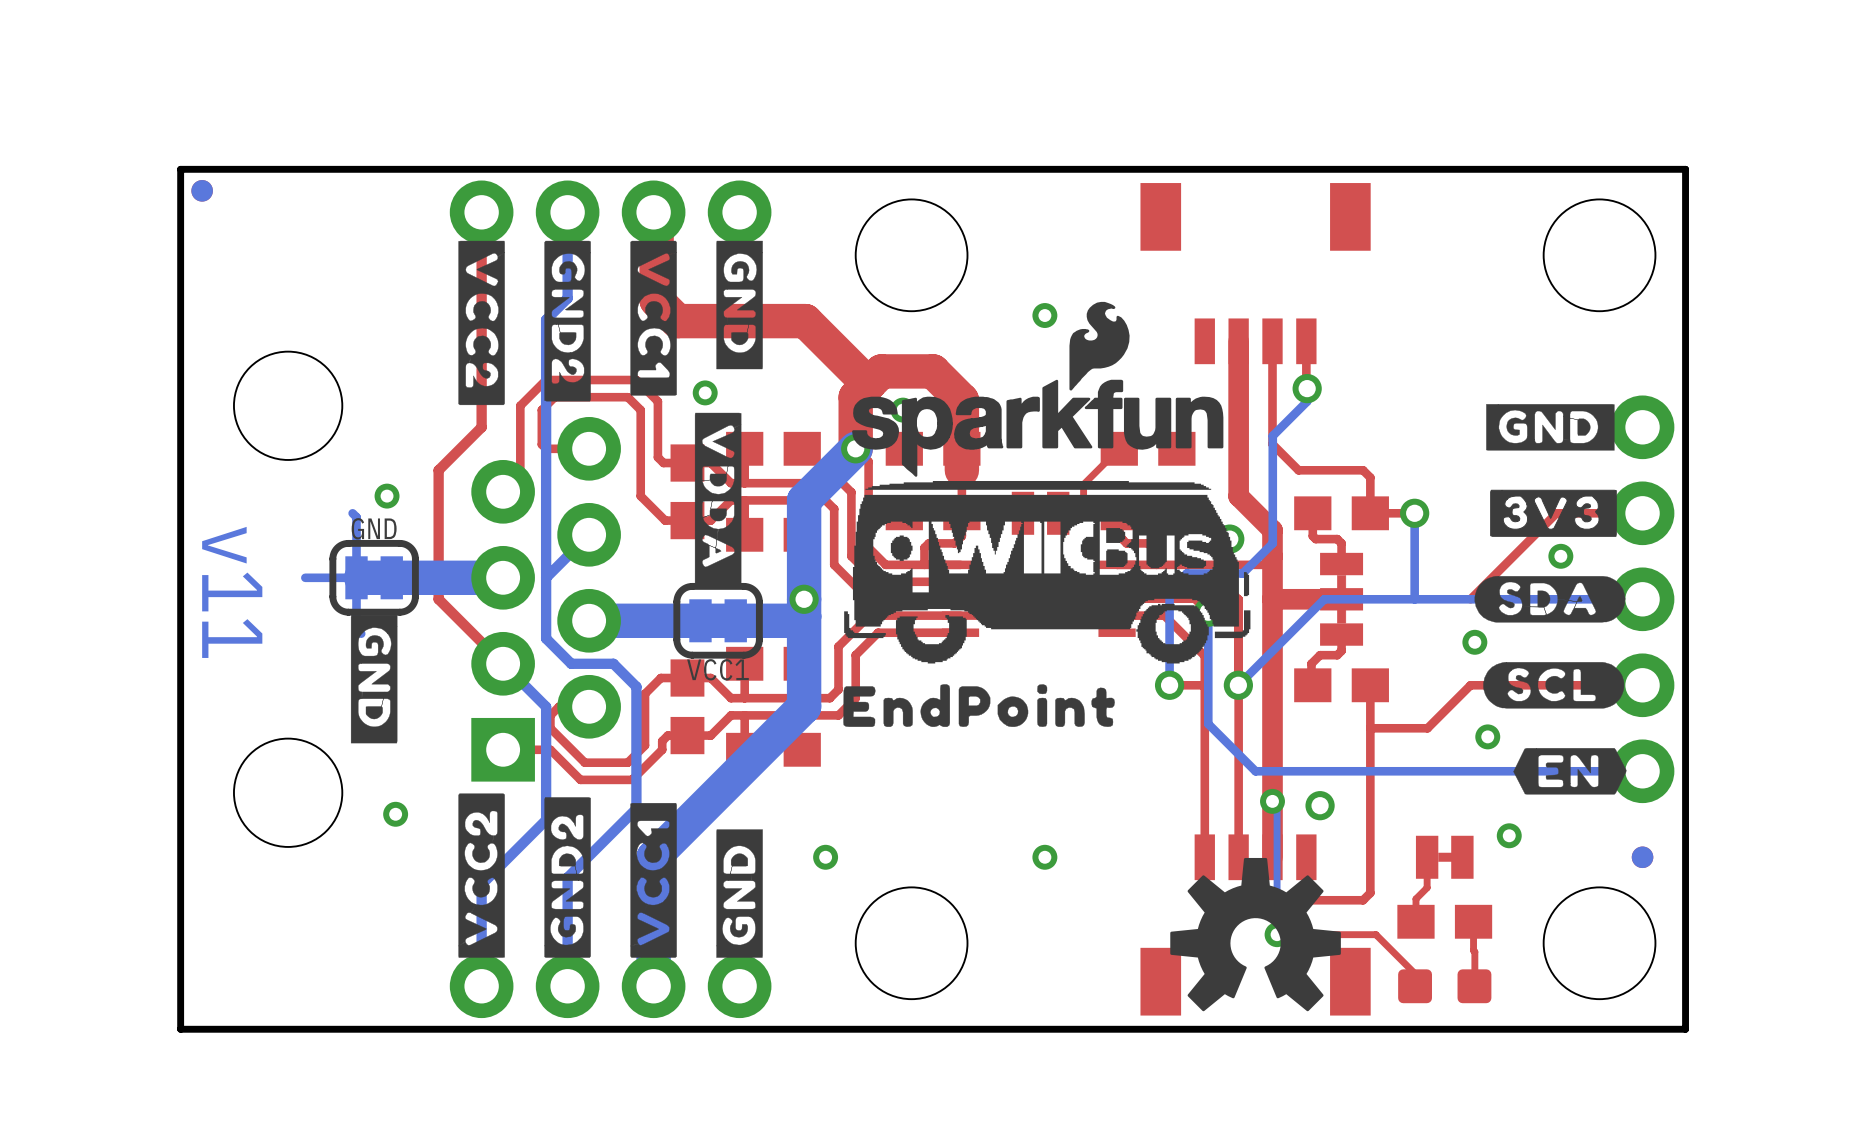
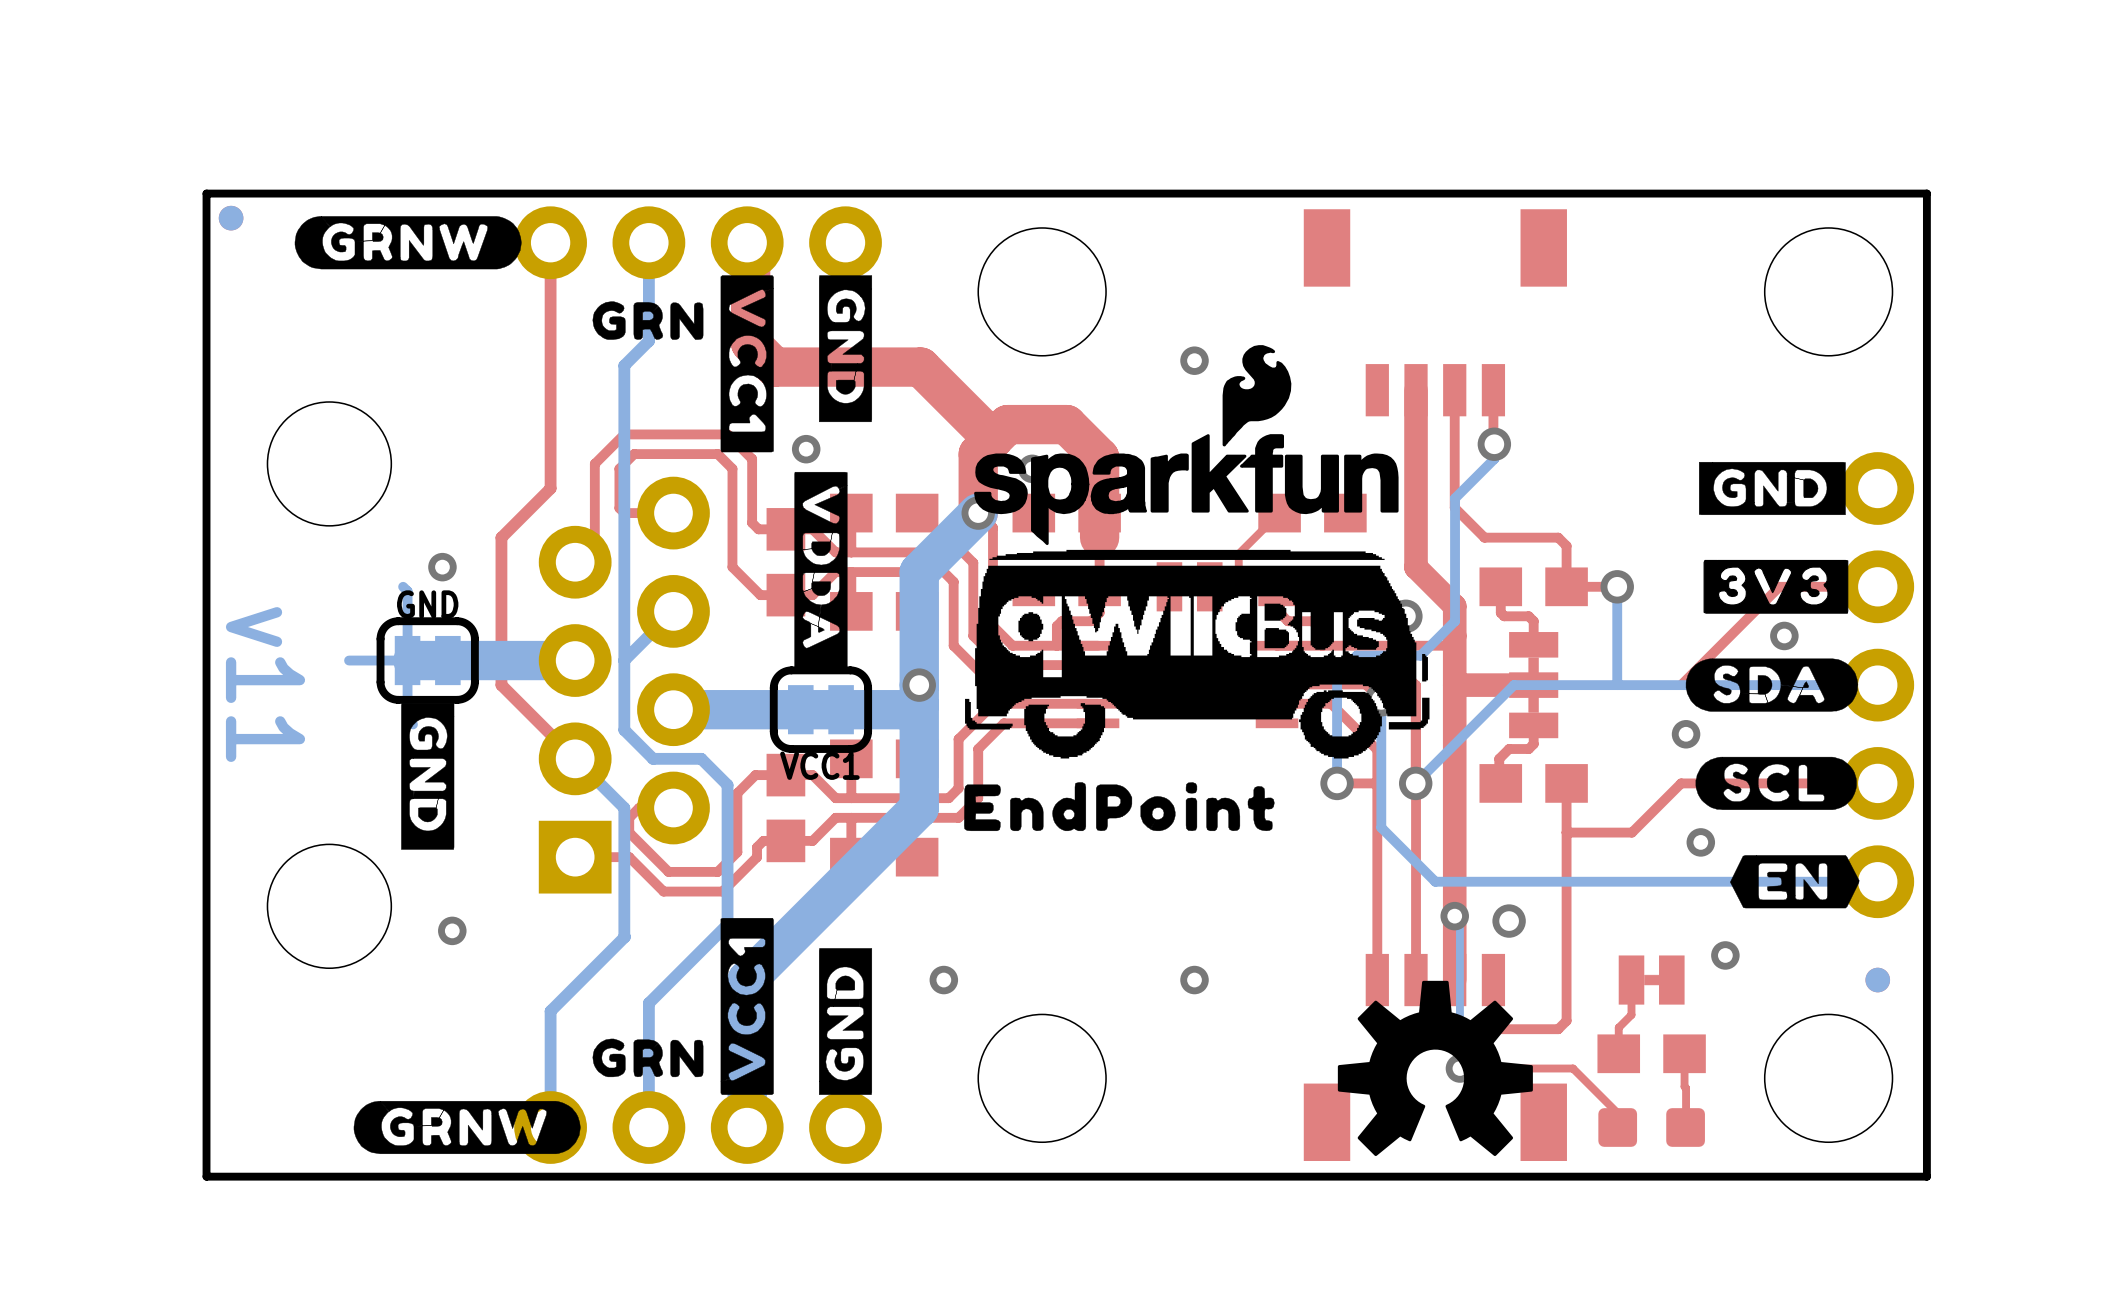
drawing: none -> [294, 216, 522, 270]
drawing: [458, 240, 591, 406] -> none
drawing: none -> [592, 301, 704, 340]
drawing: [458, 793, 591, 958] -> none
drawing: none -> [353, 1038, 704, 1155]

